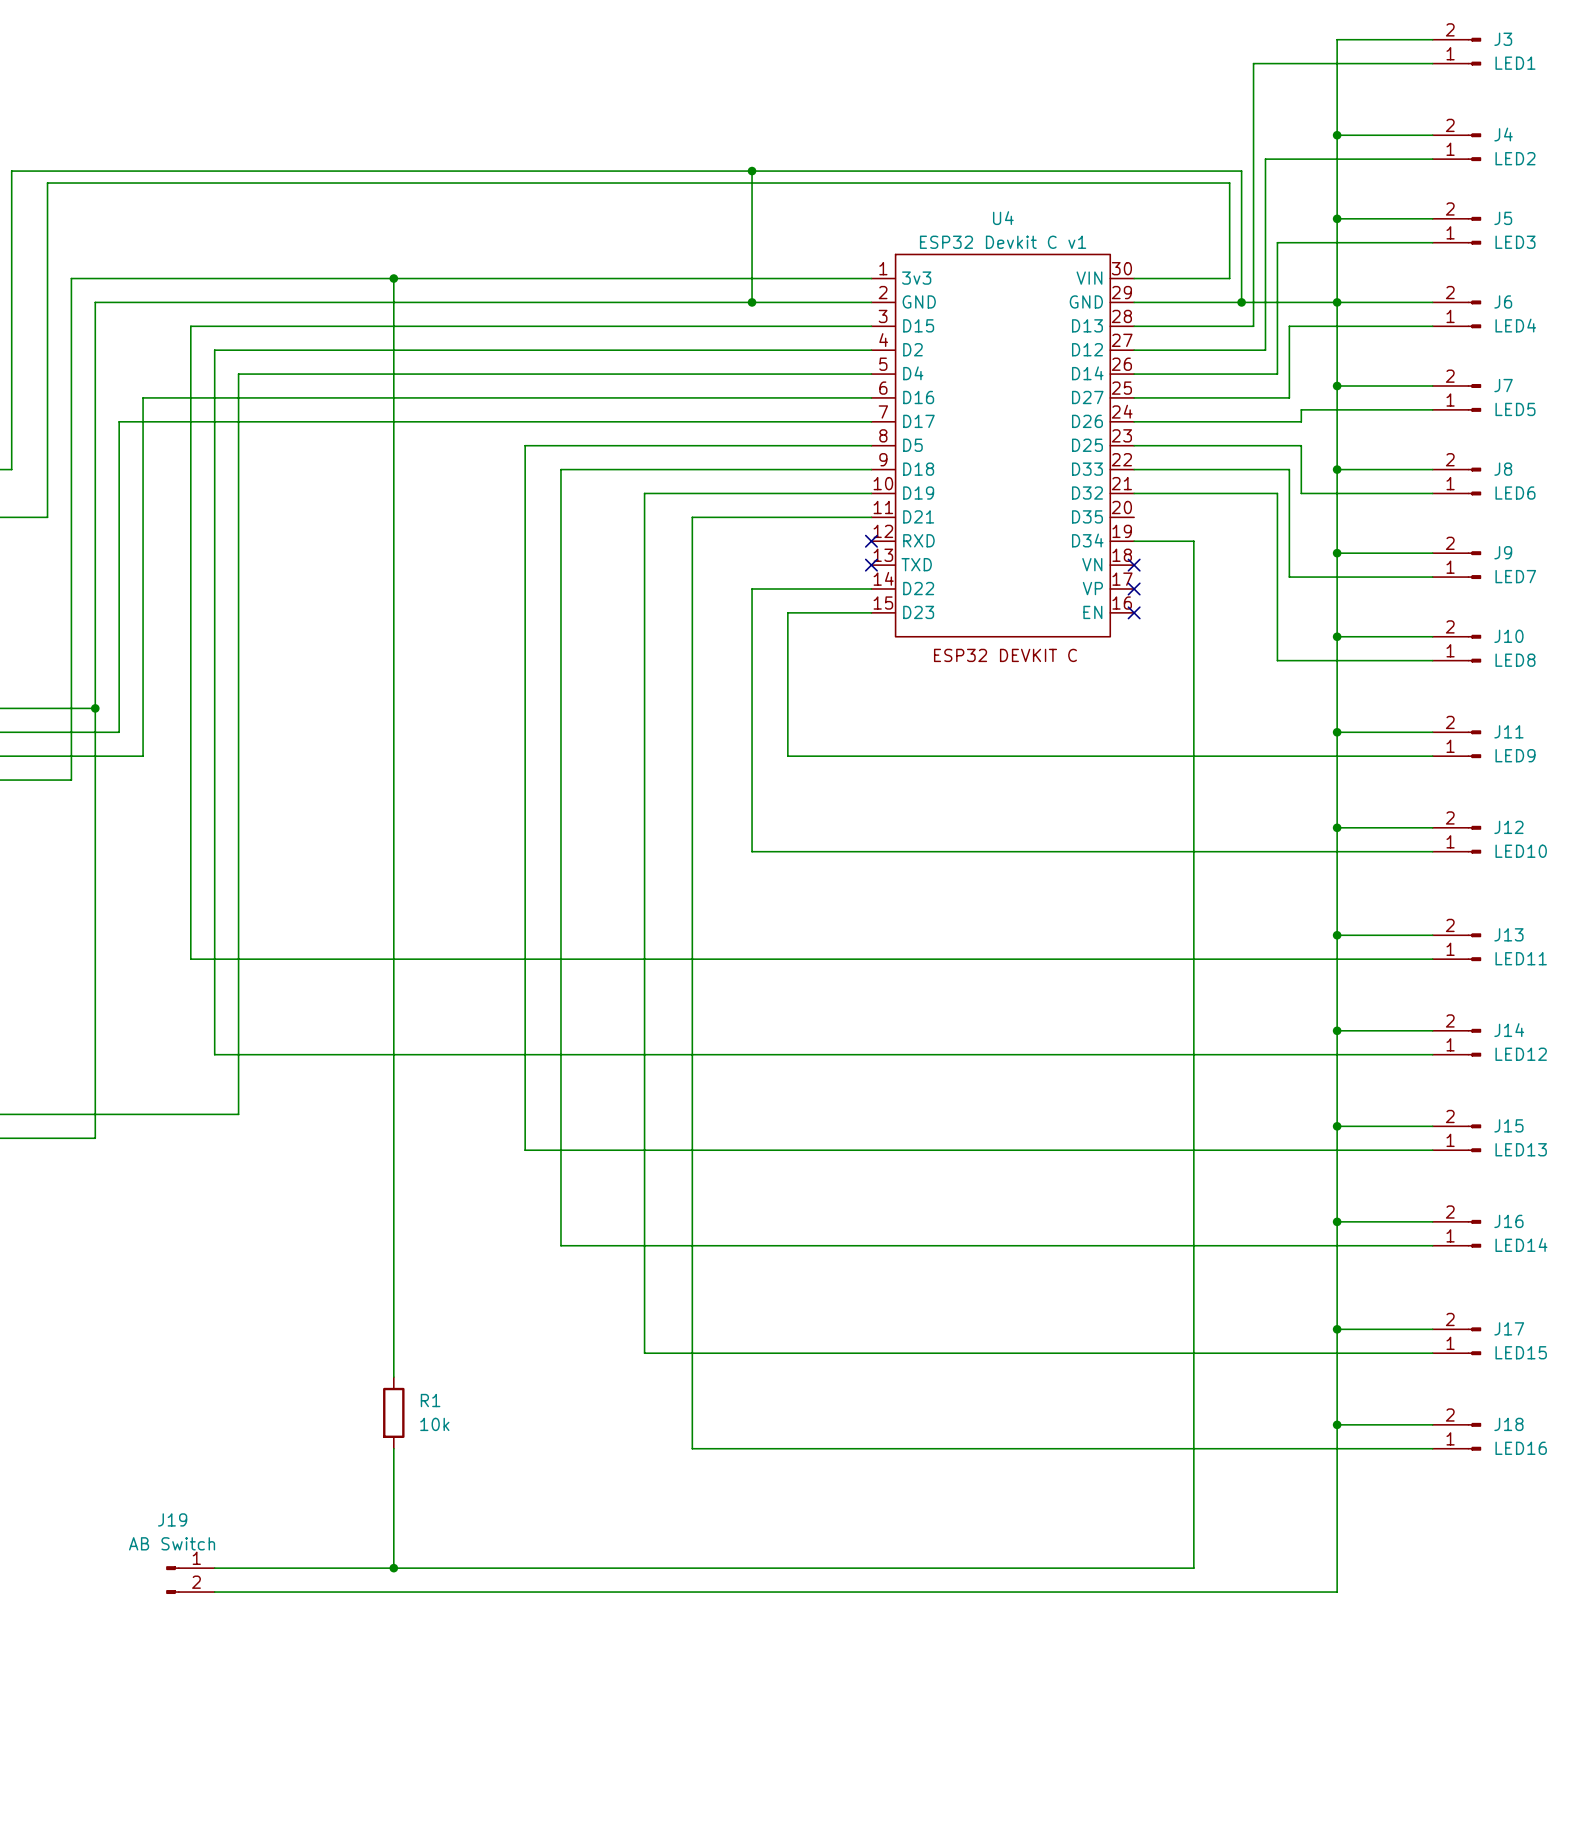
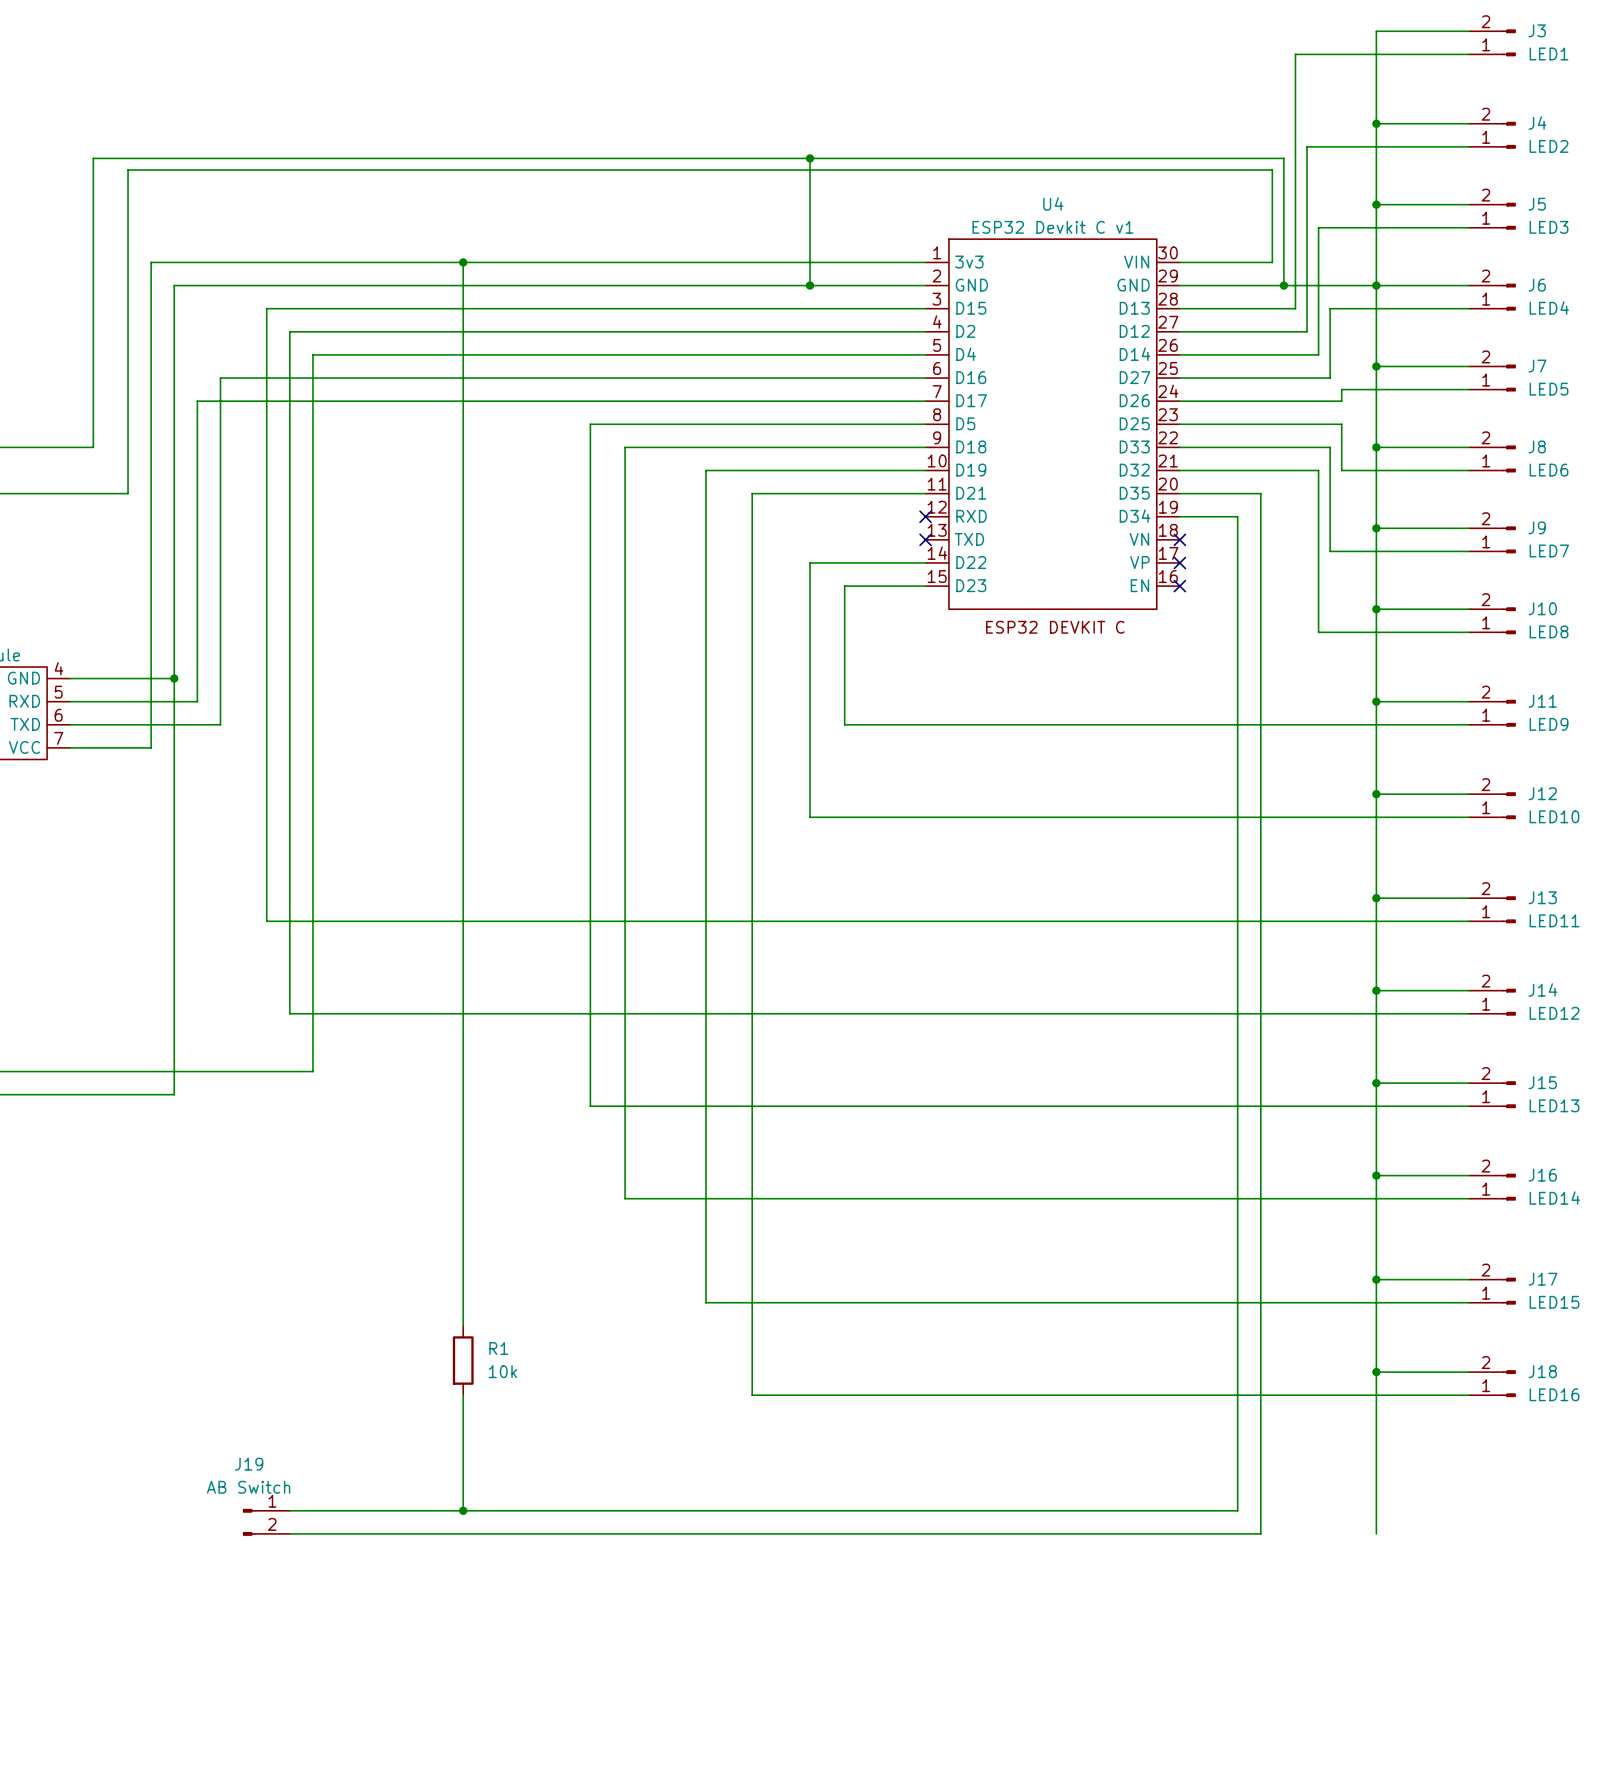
wire: (1217, 1592) (1337, 1592) -> (1260, 1533) (1260, 493) (1179, 493)

